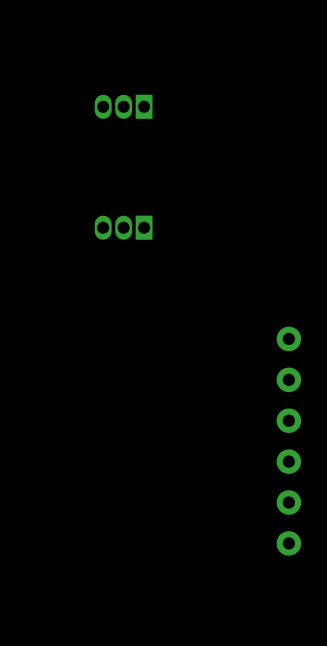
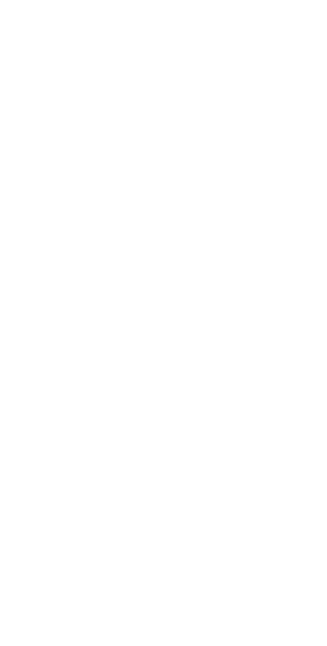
part: (123, 106) -> none
part: (123, 227) -> none
part: (288, 441) -> none

